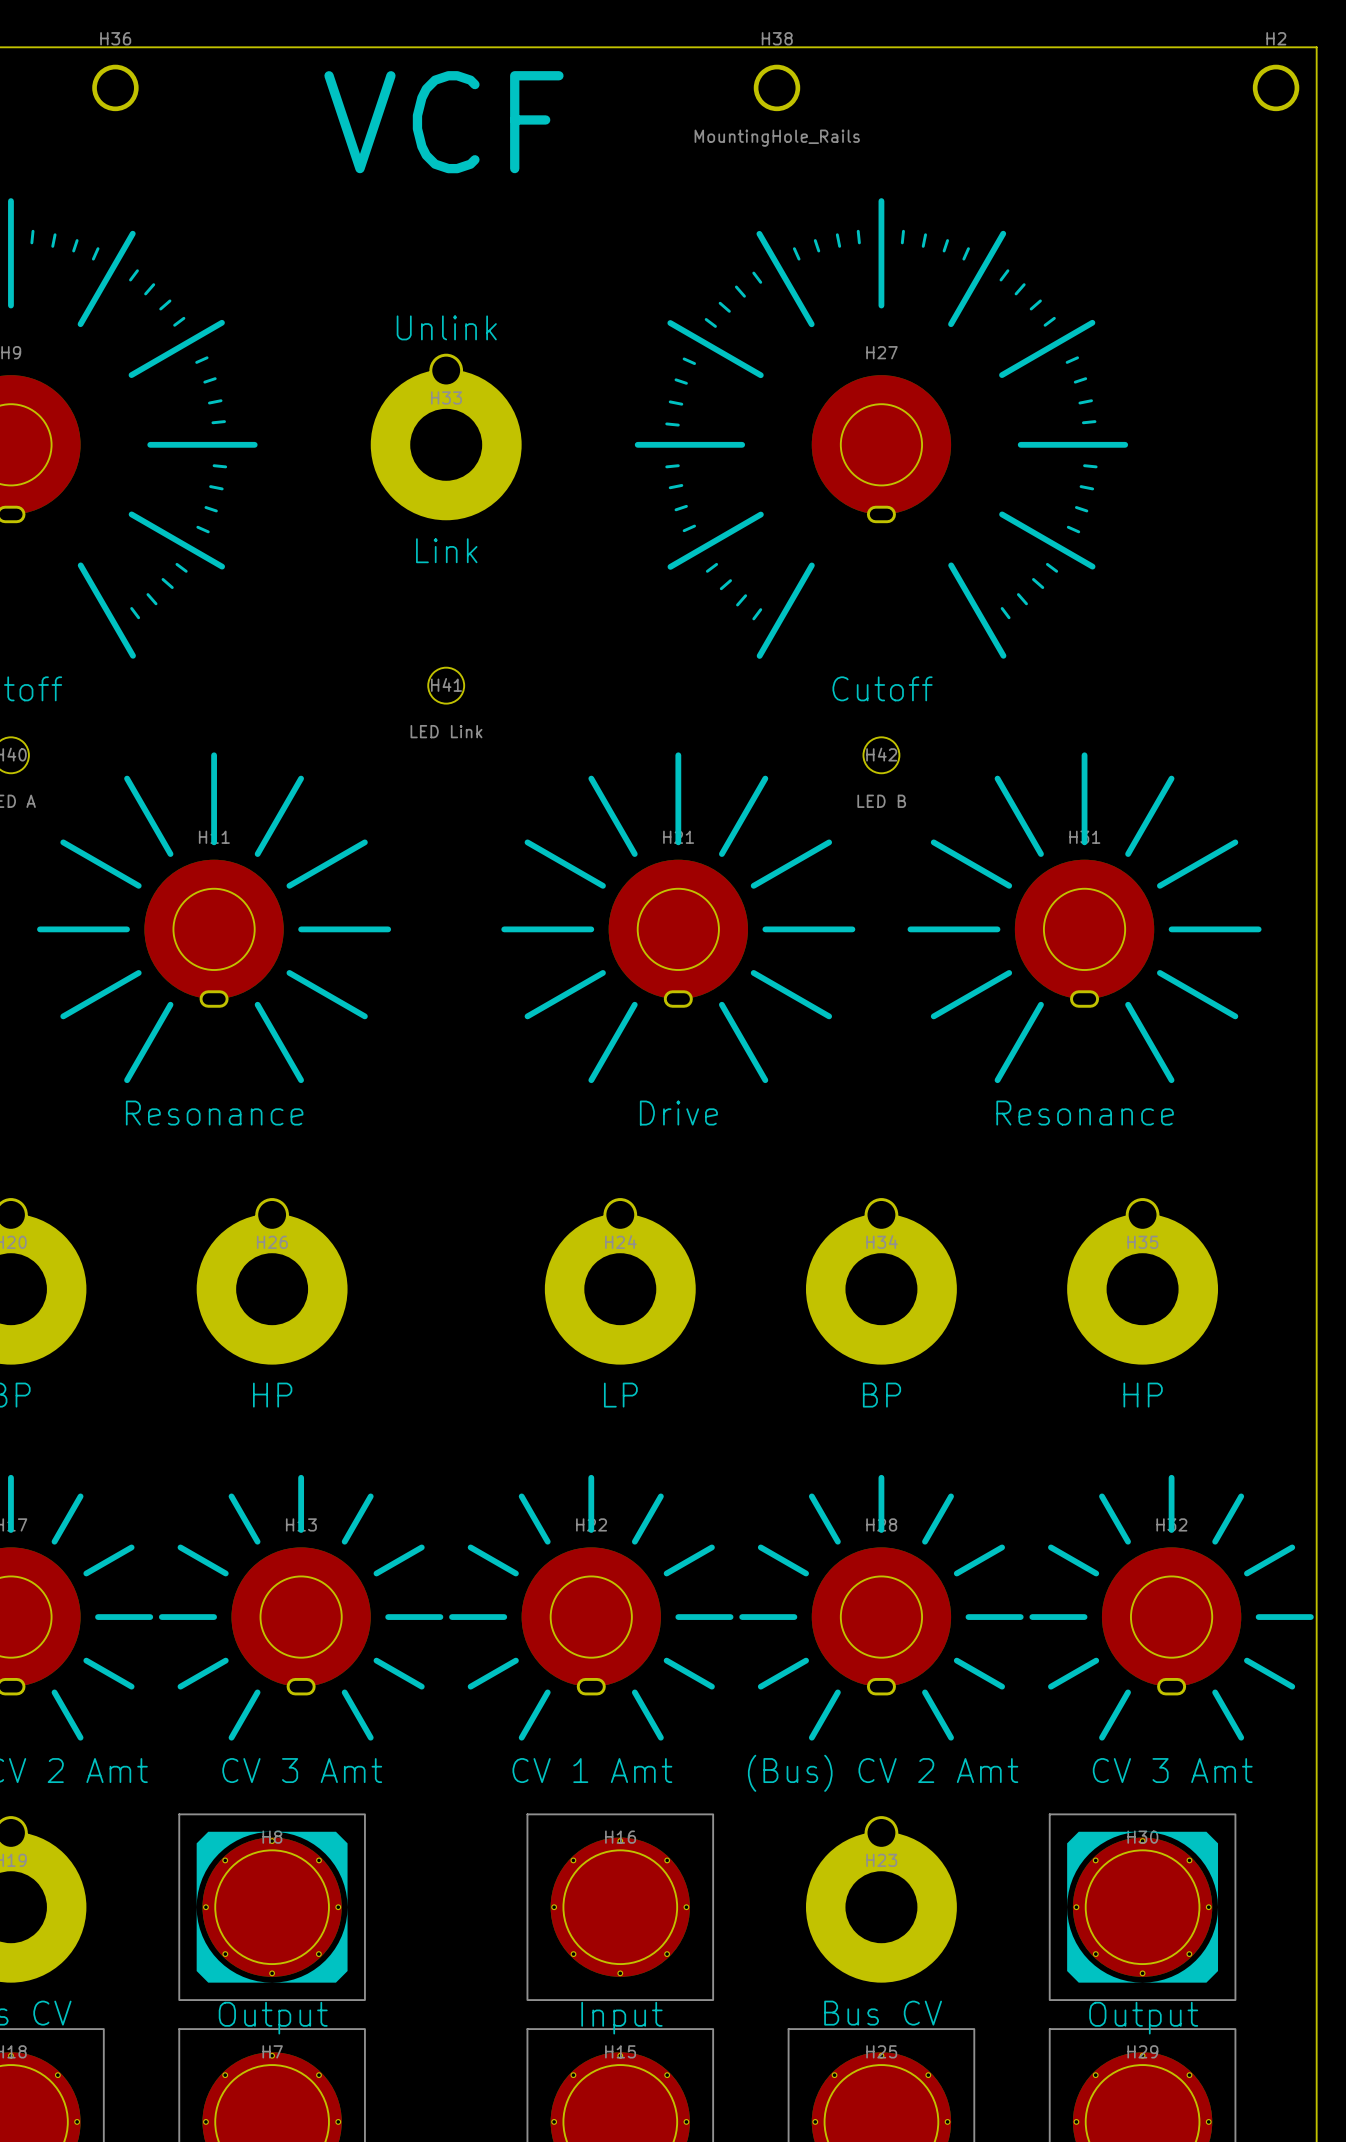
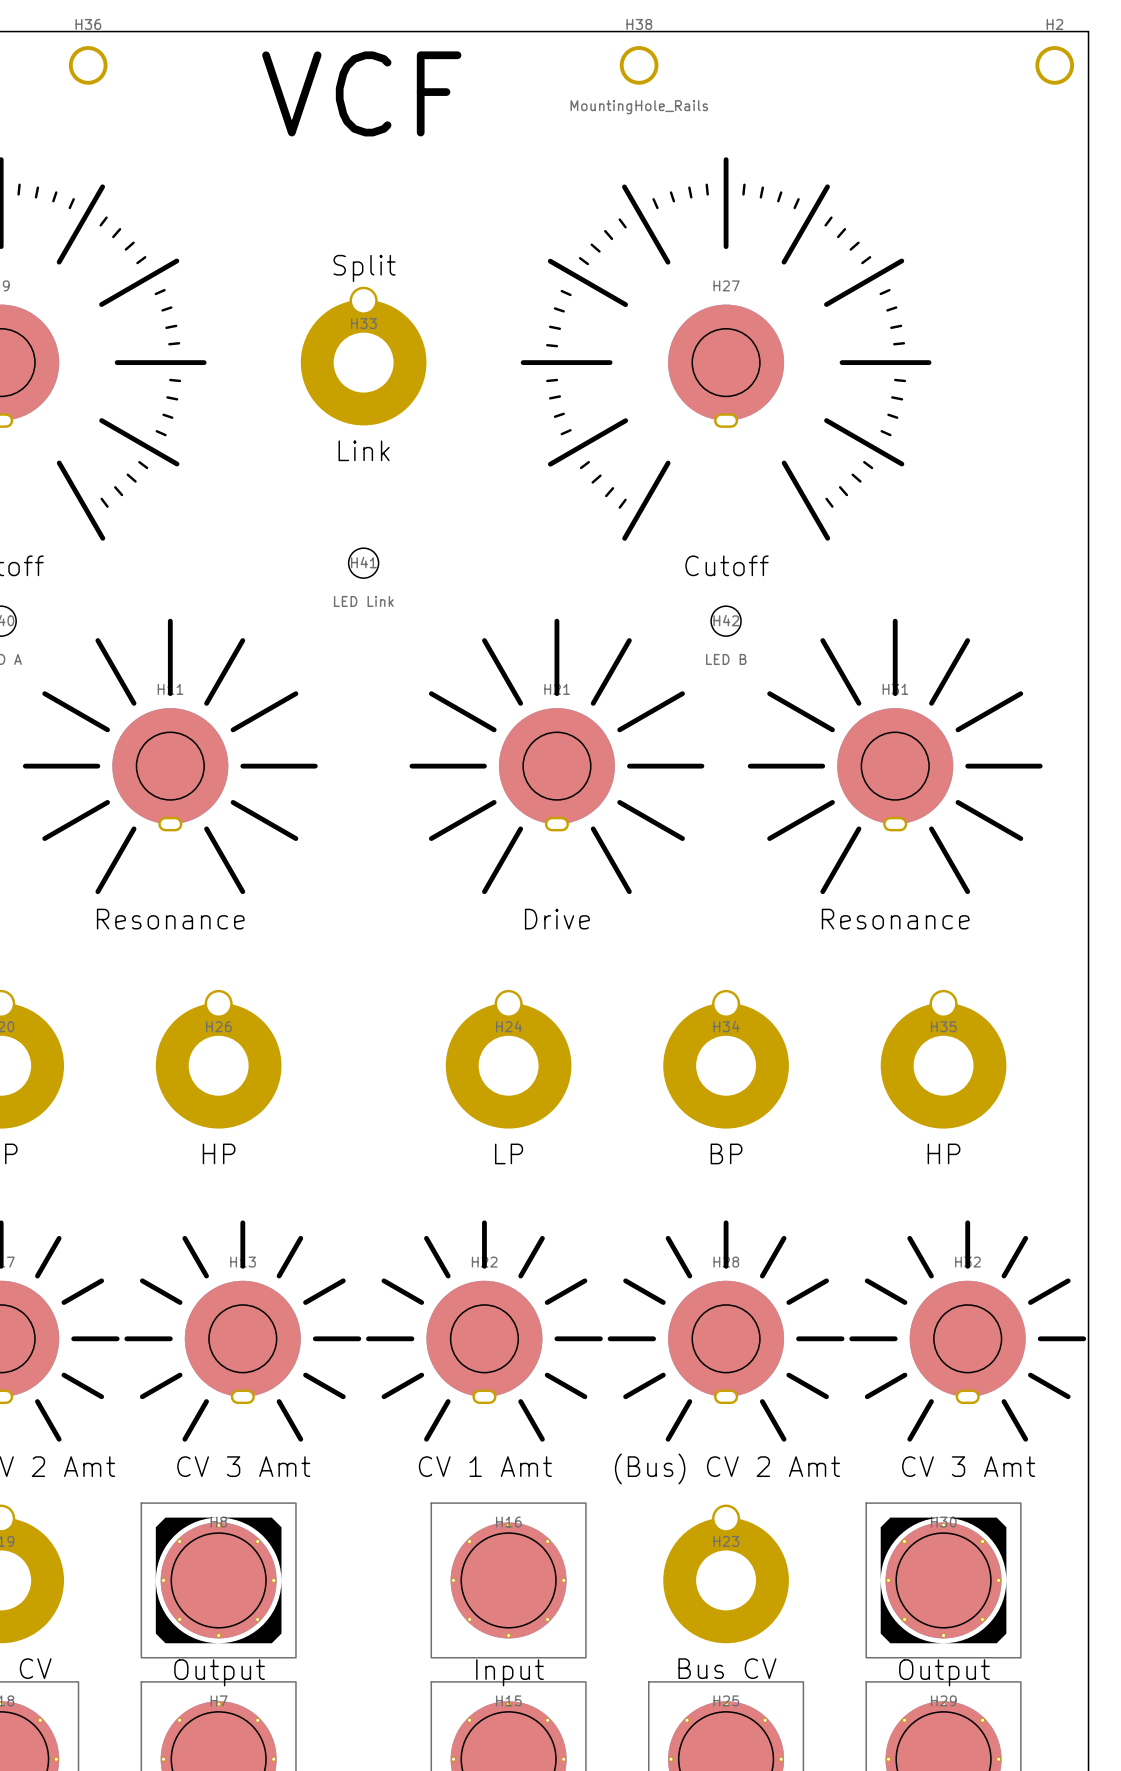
text: Unlink (446, 327) -> Split (364, 268)

